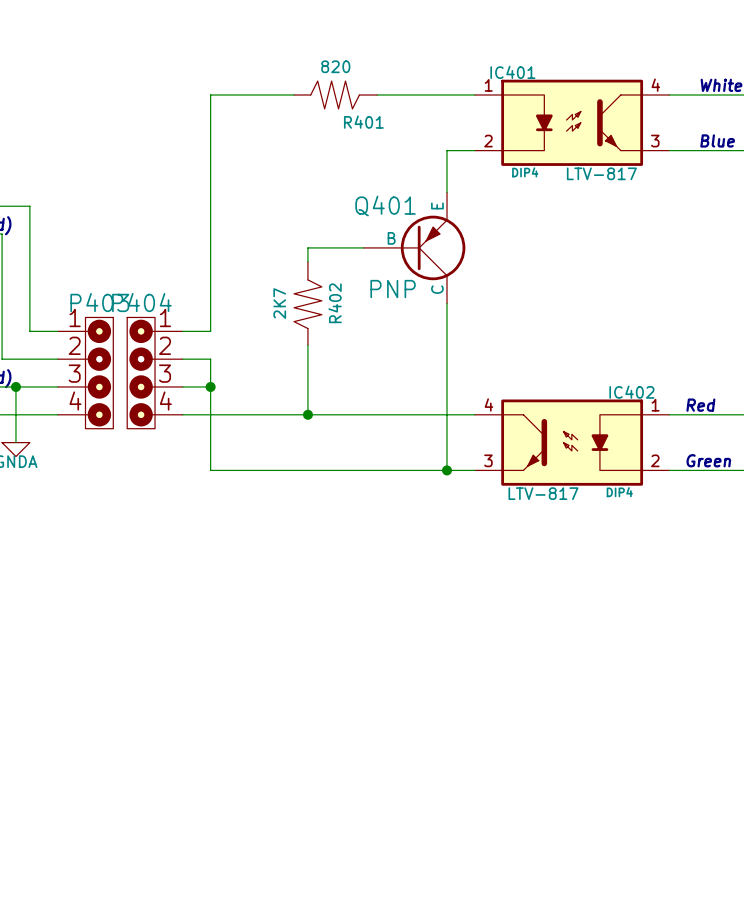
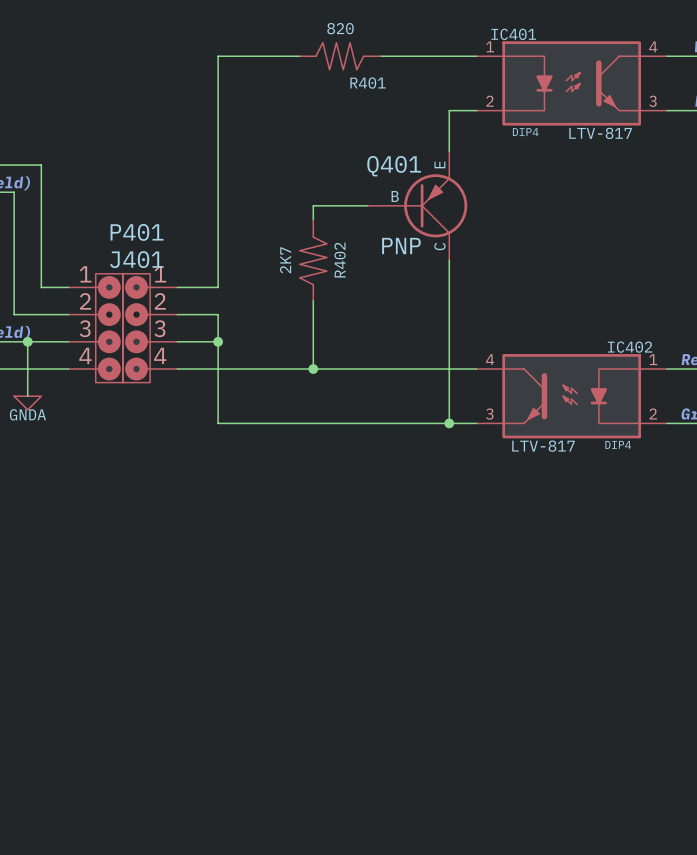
P403 name: P403 (99, 302) -> P401 (137, 232)
J401: none -> (150, 328)
P404: (155, 373) -> none

